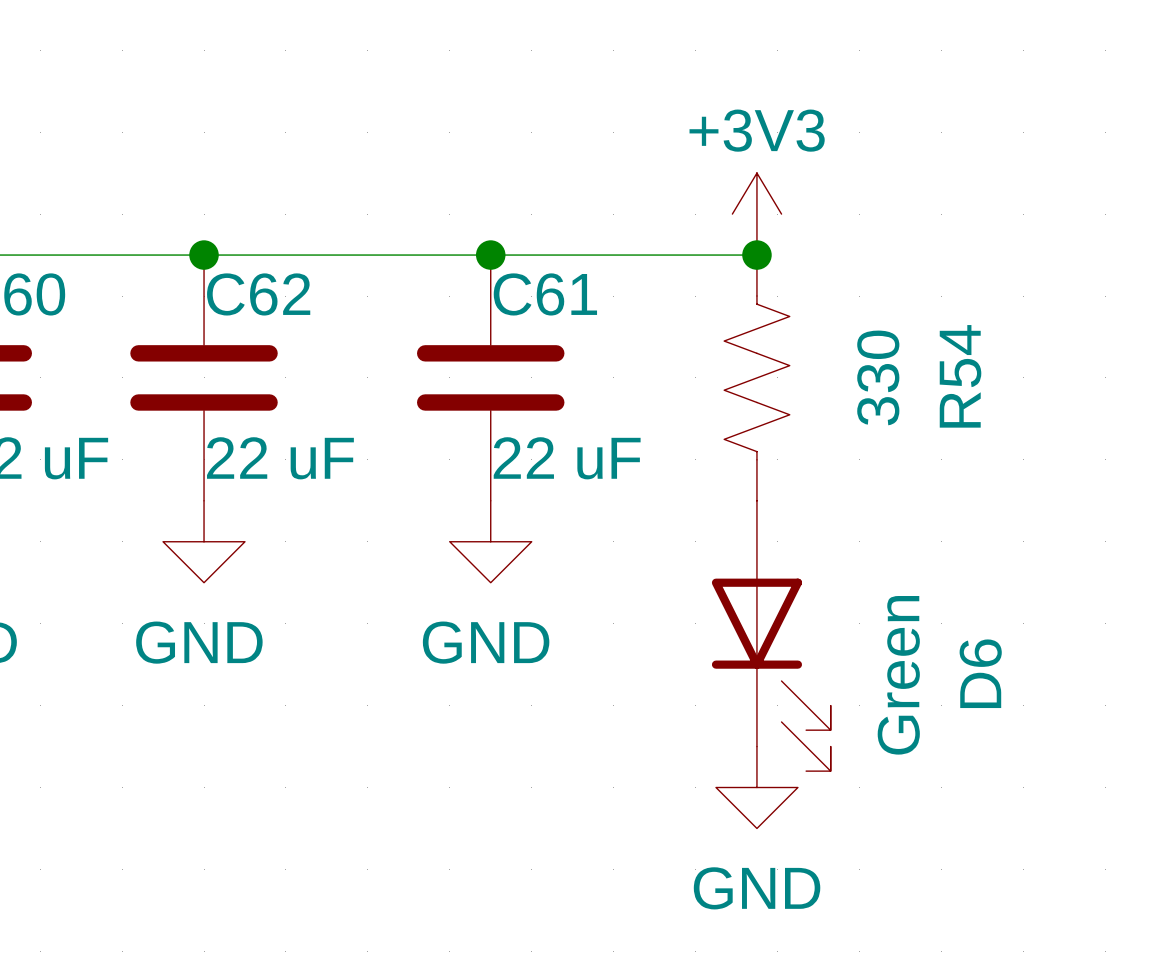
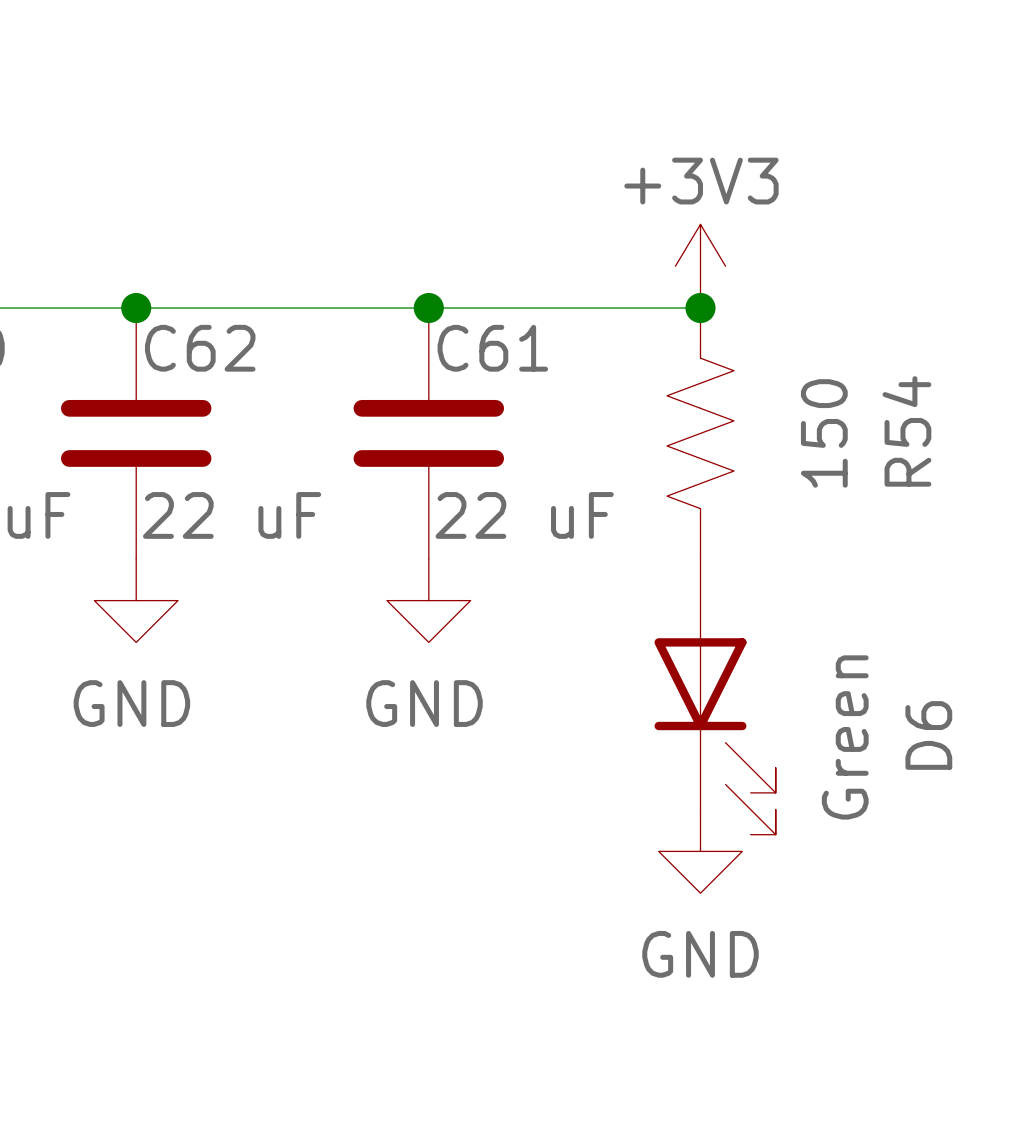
R54 value: 330 (878, 377) -> 150 (824, 433)

